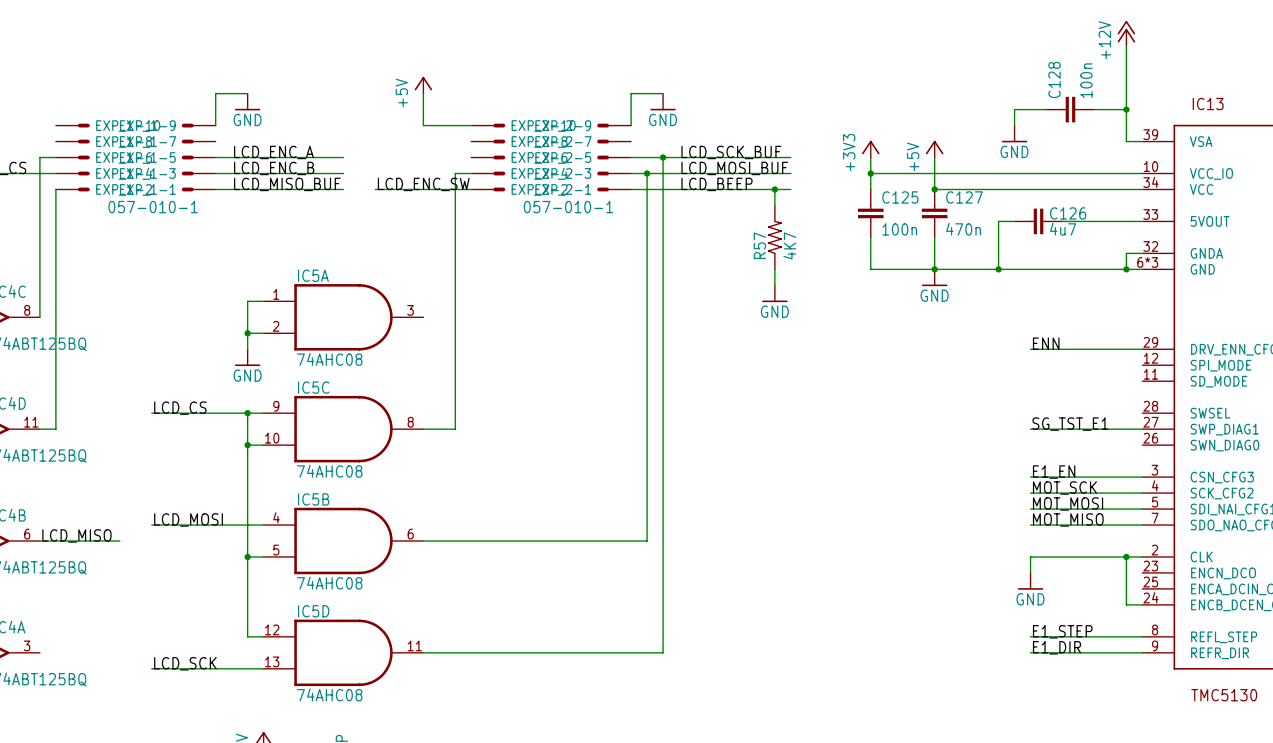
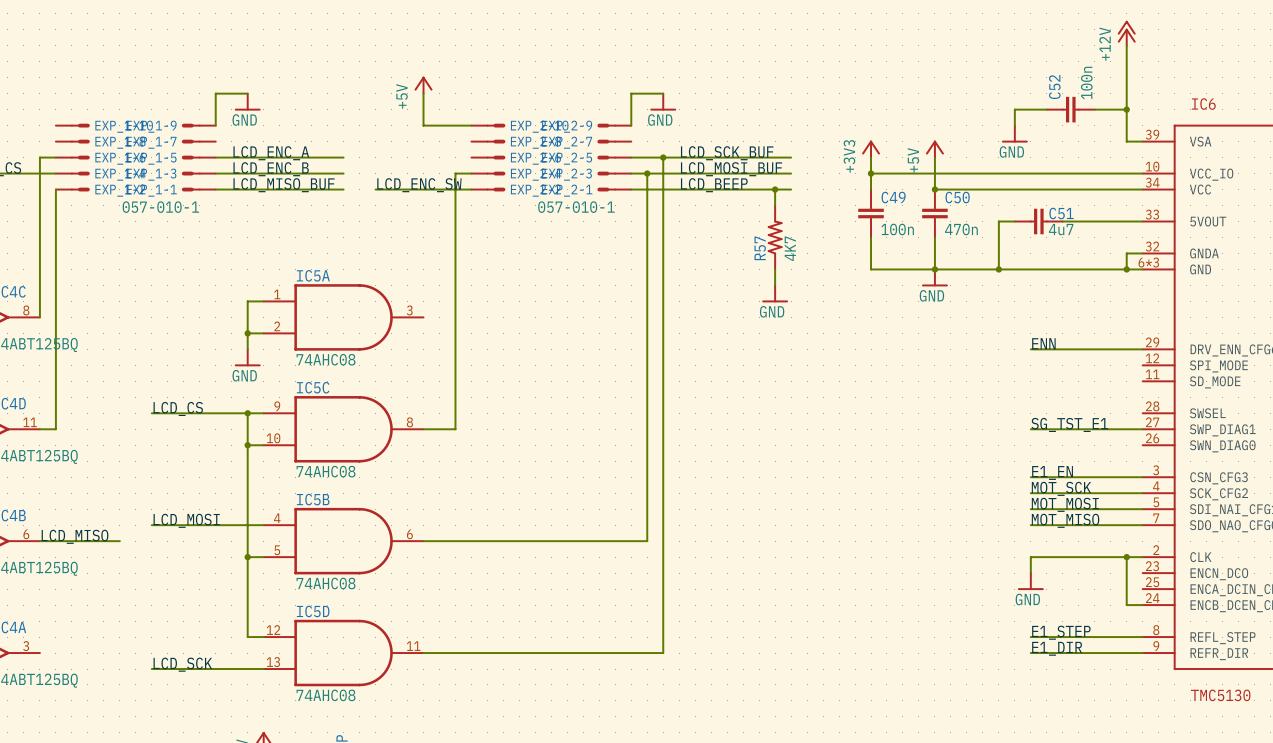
C128 name: C128 (1054, 80) -> C52 (1054, 87)
IC13 name: IC13 (1208, 104) -> IC6 (1203, 104)
C125 name: C125 (900, 197) -> C49 (893, 197)
C127 name: C127 (964, 197) -> C50 (957, 197)
C126 name: C126 (1068, 213) -> C51 (1061, 213)

